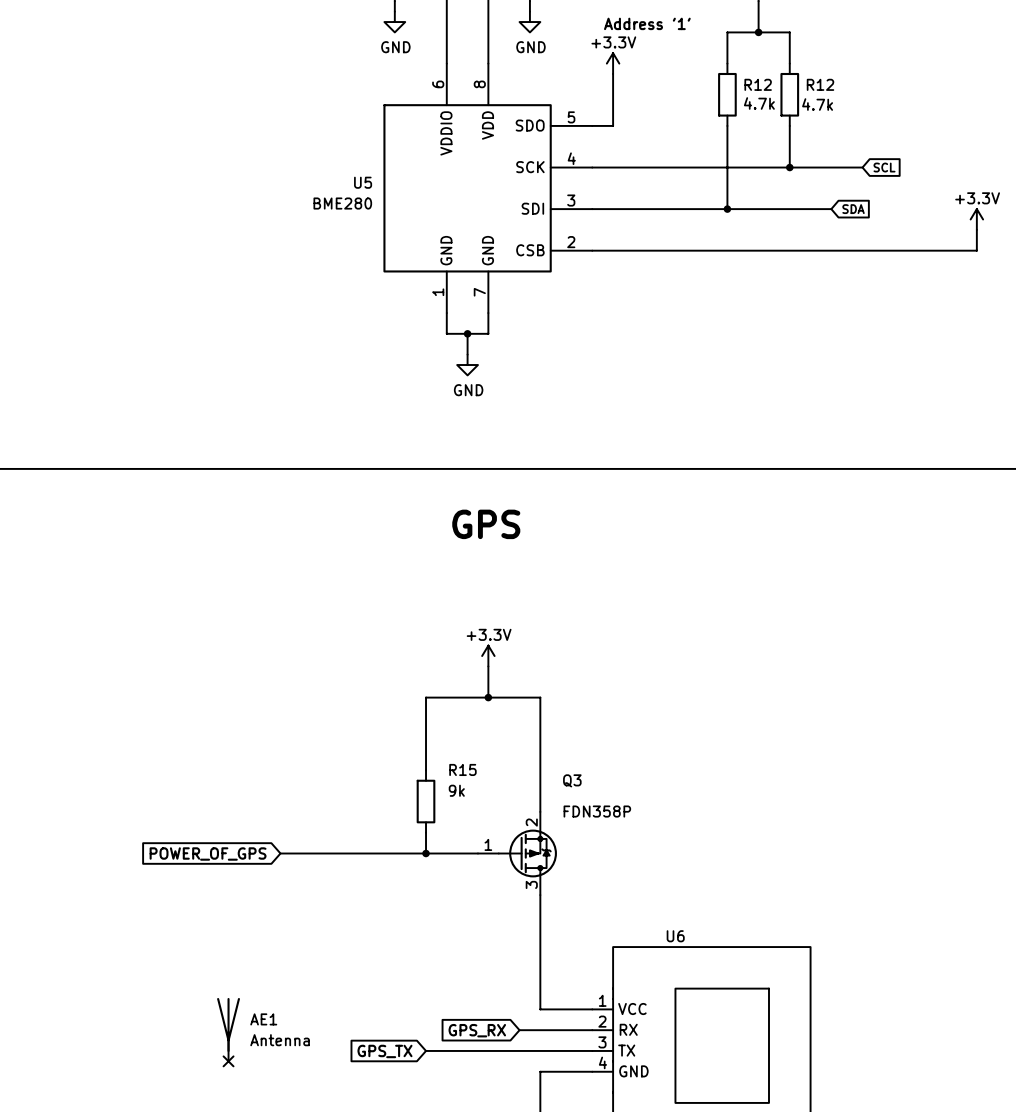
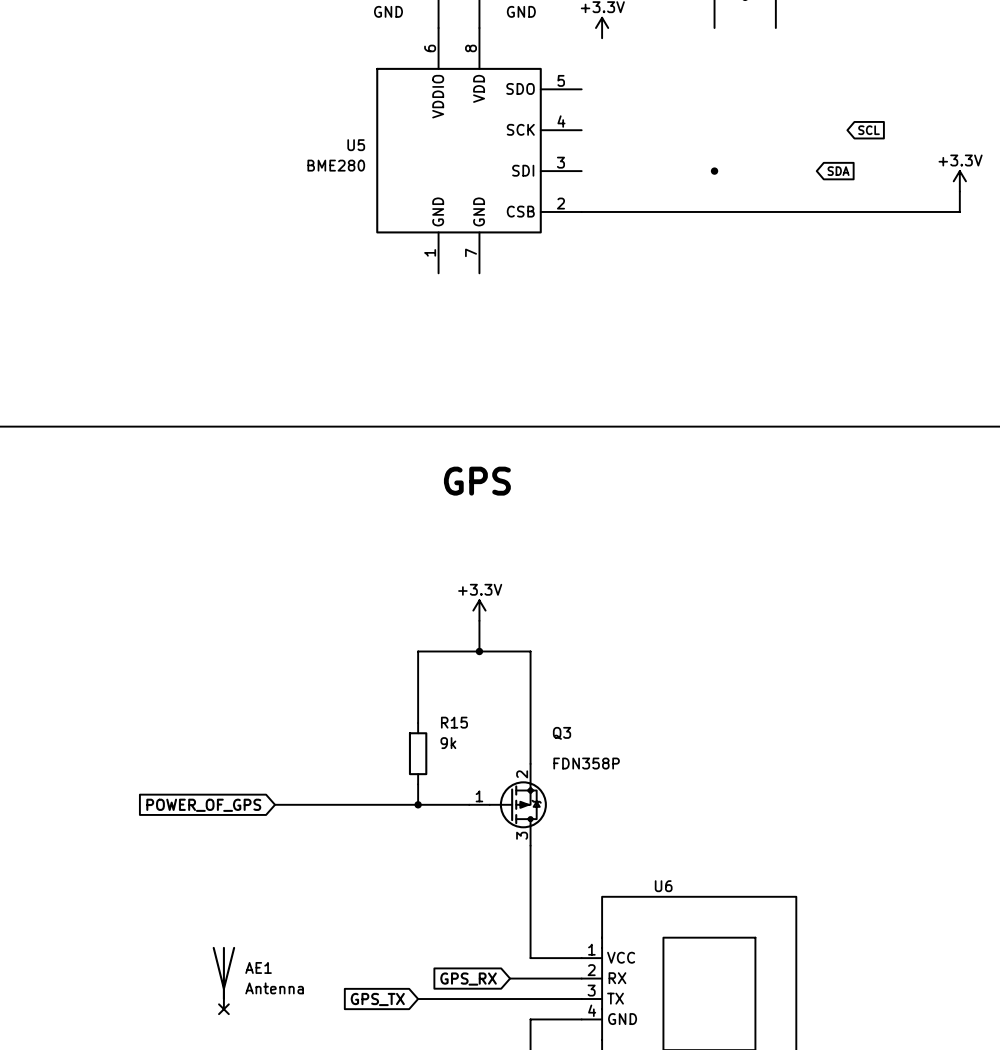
wire: (613, 73) (613, 125) (592, 125) -> none
R12: 4.7k (727, 94) -> none
R12: 4.7k (789, 94) -> none
wire: (727, 125) (727, 209) -> none
wire: (789, 125) (789, 167) -> none
wire: (592, 167) (862, 167) -> none
junction: (789, 167) -> none
wire: (592, 209) (831, 209) -> none
wire: (446, 313) (446, 333) (488, 333) (488, 313) -> none
wire: (467, 333) (467, 354) -> none
junction: (467, 333) -> none
power symbol: GND (467, 365) -> none

